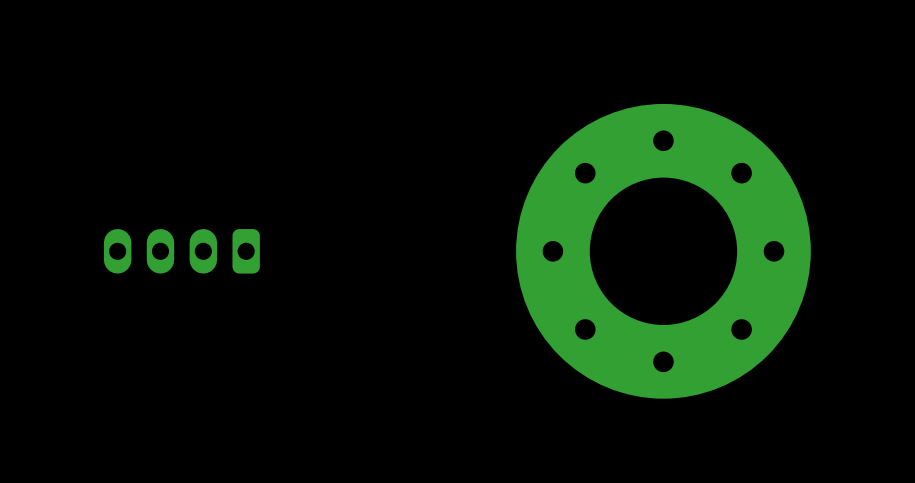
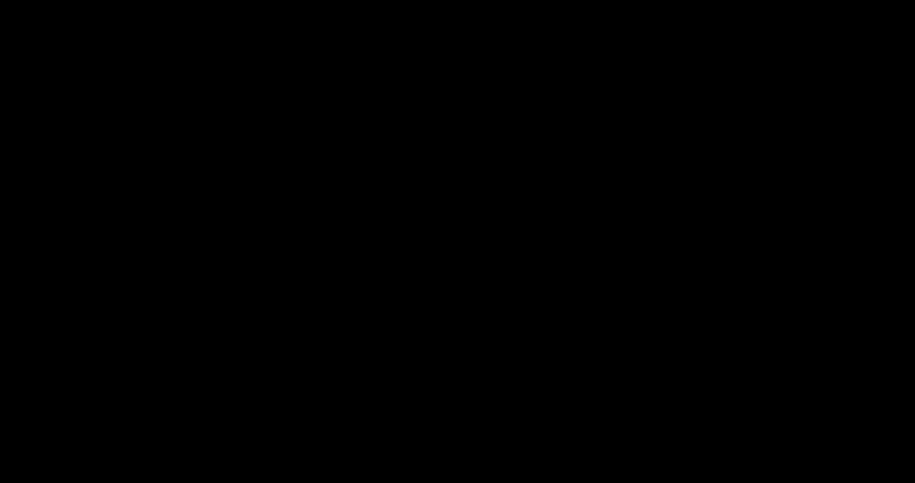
part: (181, 251) -> none
part: (663, 251) -> none

